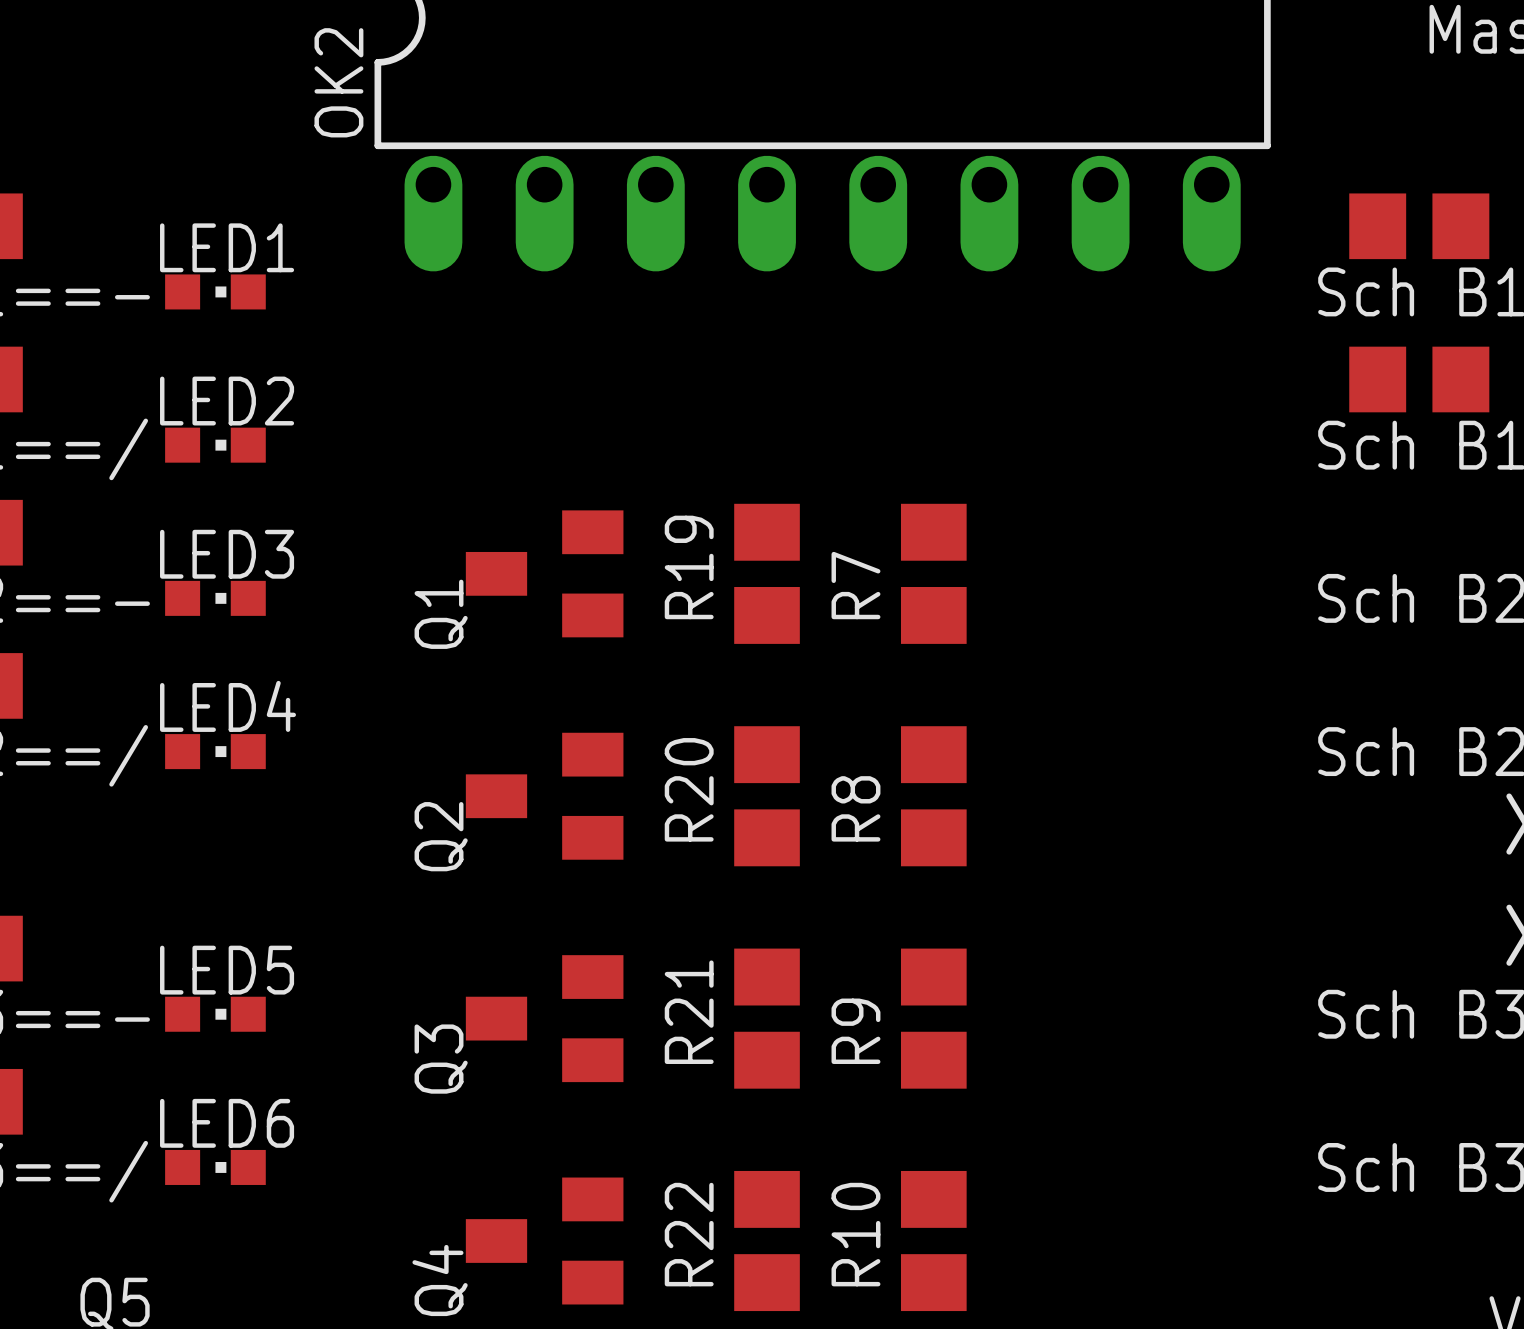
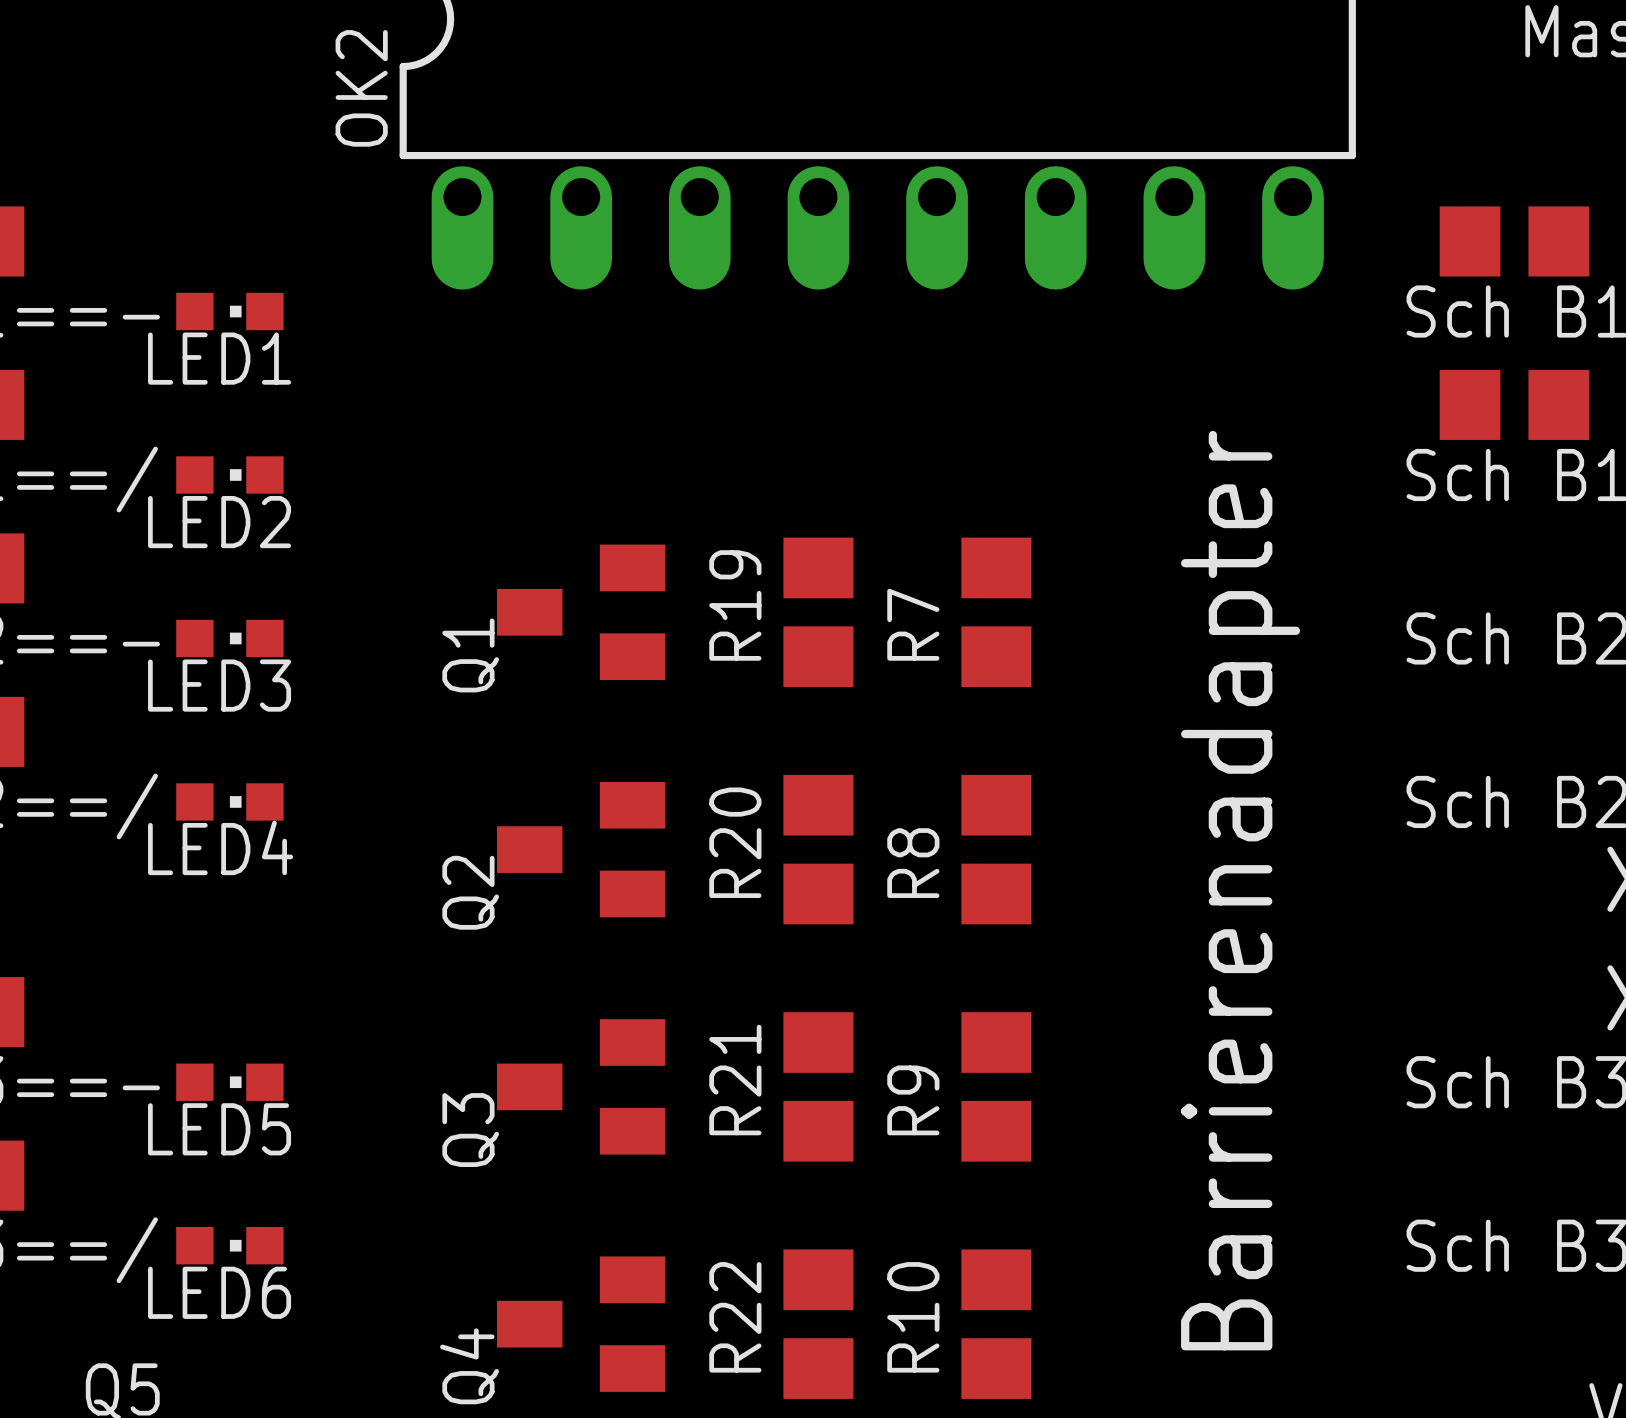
LED1 name position: LED1 (227, 247) -> LED1 (219, 358)
LED2 name position: LED2 (227, 401) -> LED2 (219, 522)
LED3 name position: LED3 (227, 554) -> LED3 (219, 685)
LED4 name position: LED4 (228, 706) -> LED4 (220, 847)
text: none -> Barrierenadapter (1240, 890)
LED5 name position: LED5 (227, 970) -> LED5 (219, 1129)
LED6 name position: LED6 (227, 1123) -> LED6 (219, 1292)

